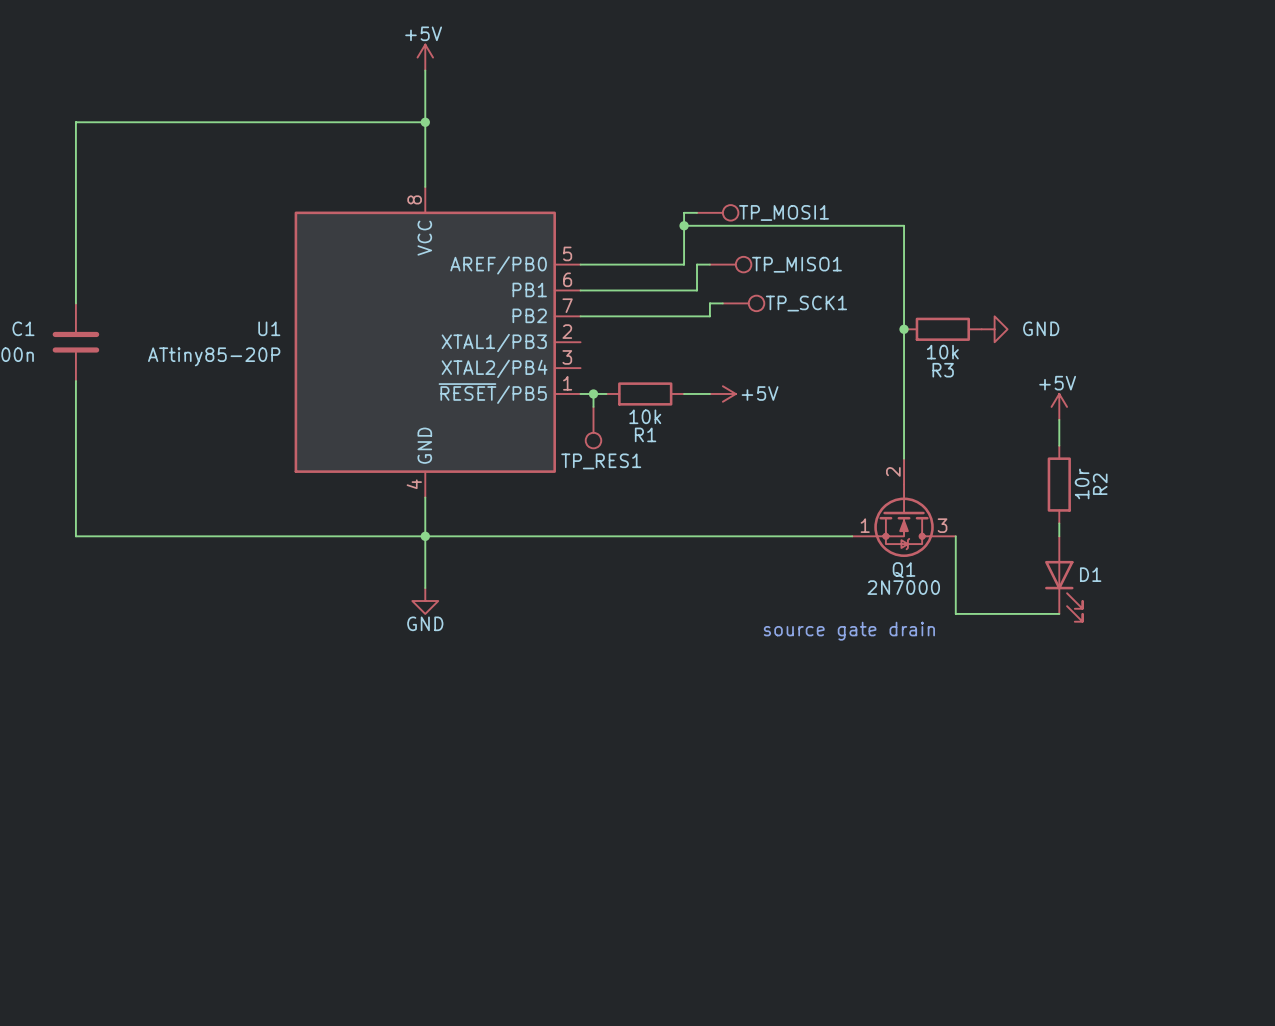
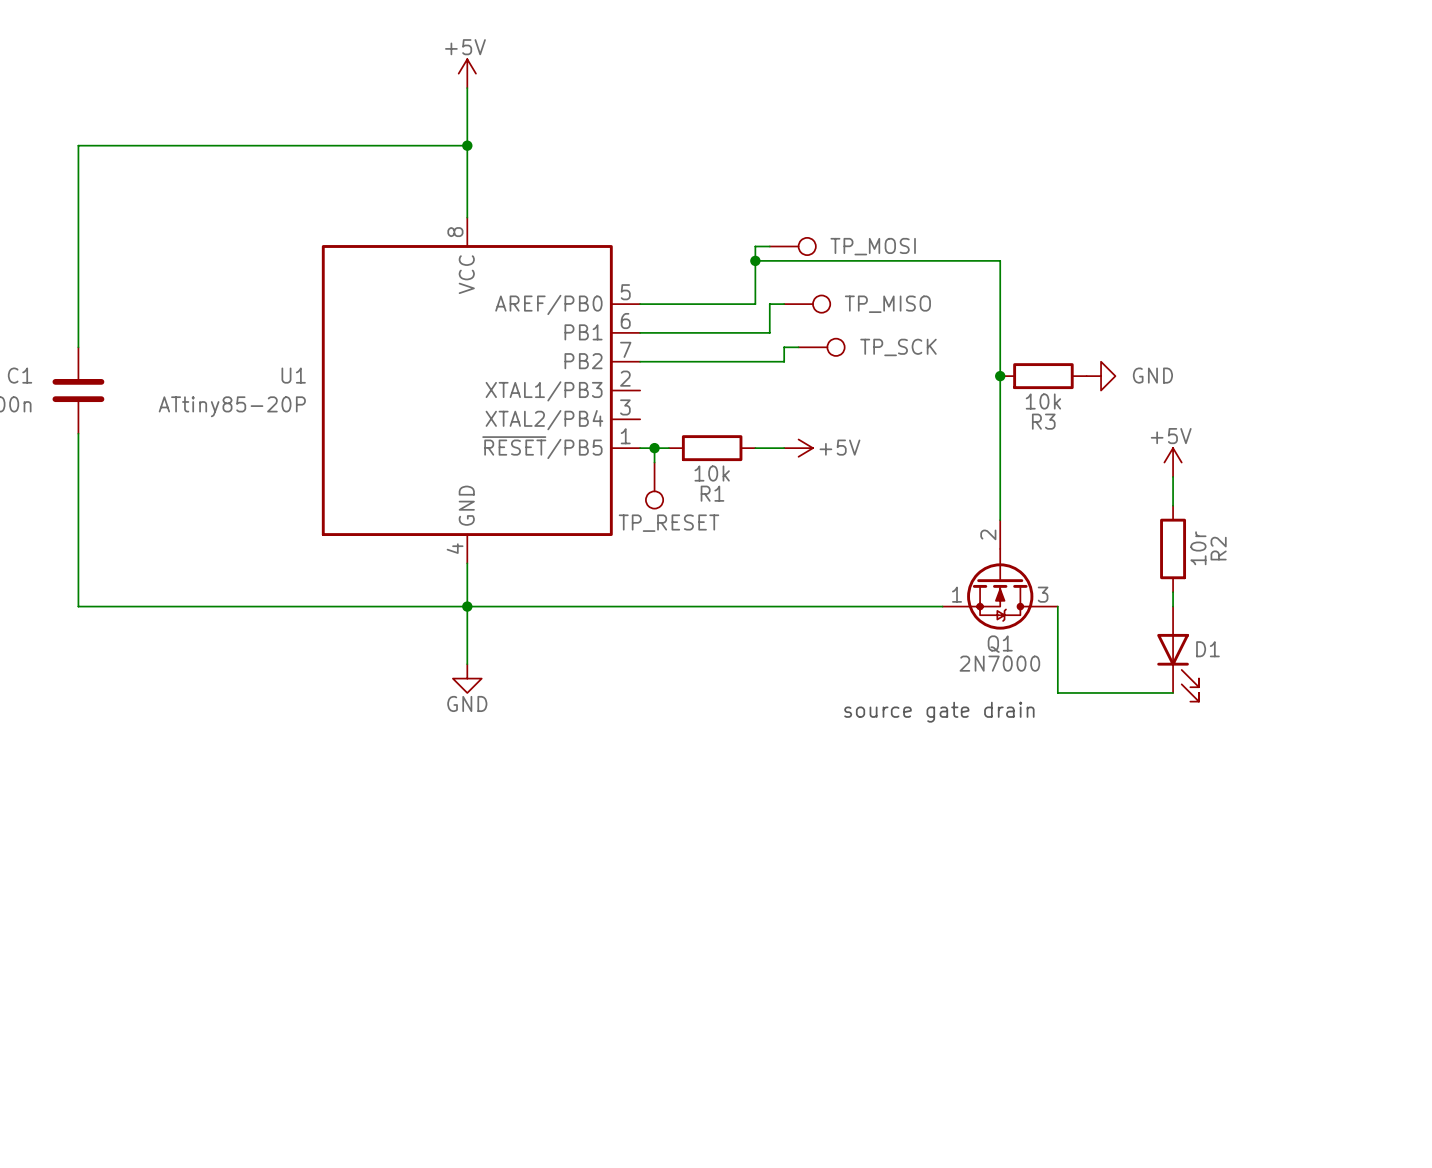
TP_MOSI1 name: TP_MOSI1 (784, 212) -> TP_MOSI (873, 246)
TP_MISO1 name: TP_MISO1 (796, 264) -> TP_MISO (887, 304)
TP_SCK1 name: TP_SCK1 (806, 303) -> TP_SCK (898, 347)
TP_RES1 name: TP_RES1 (601, 461) -> TP_RESET (668, 523)

